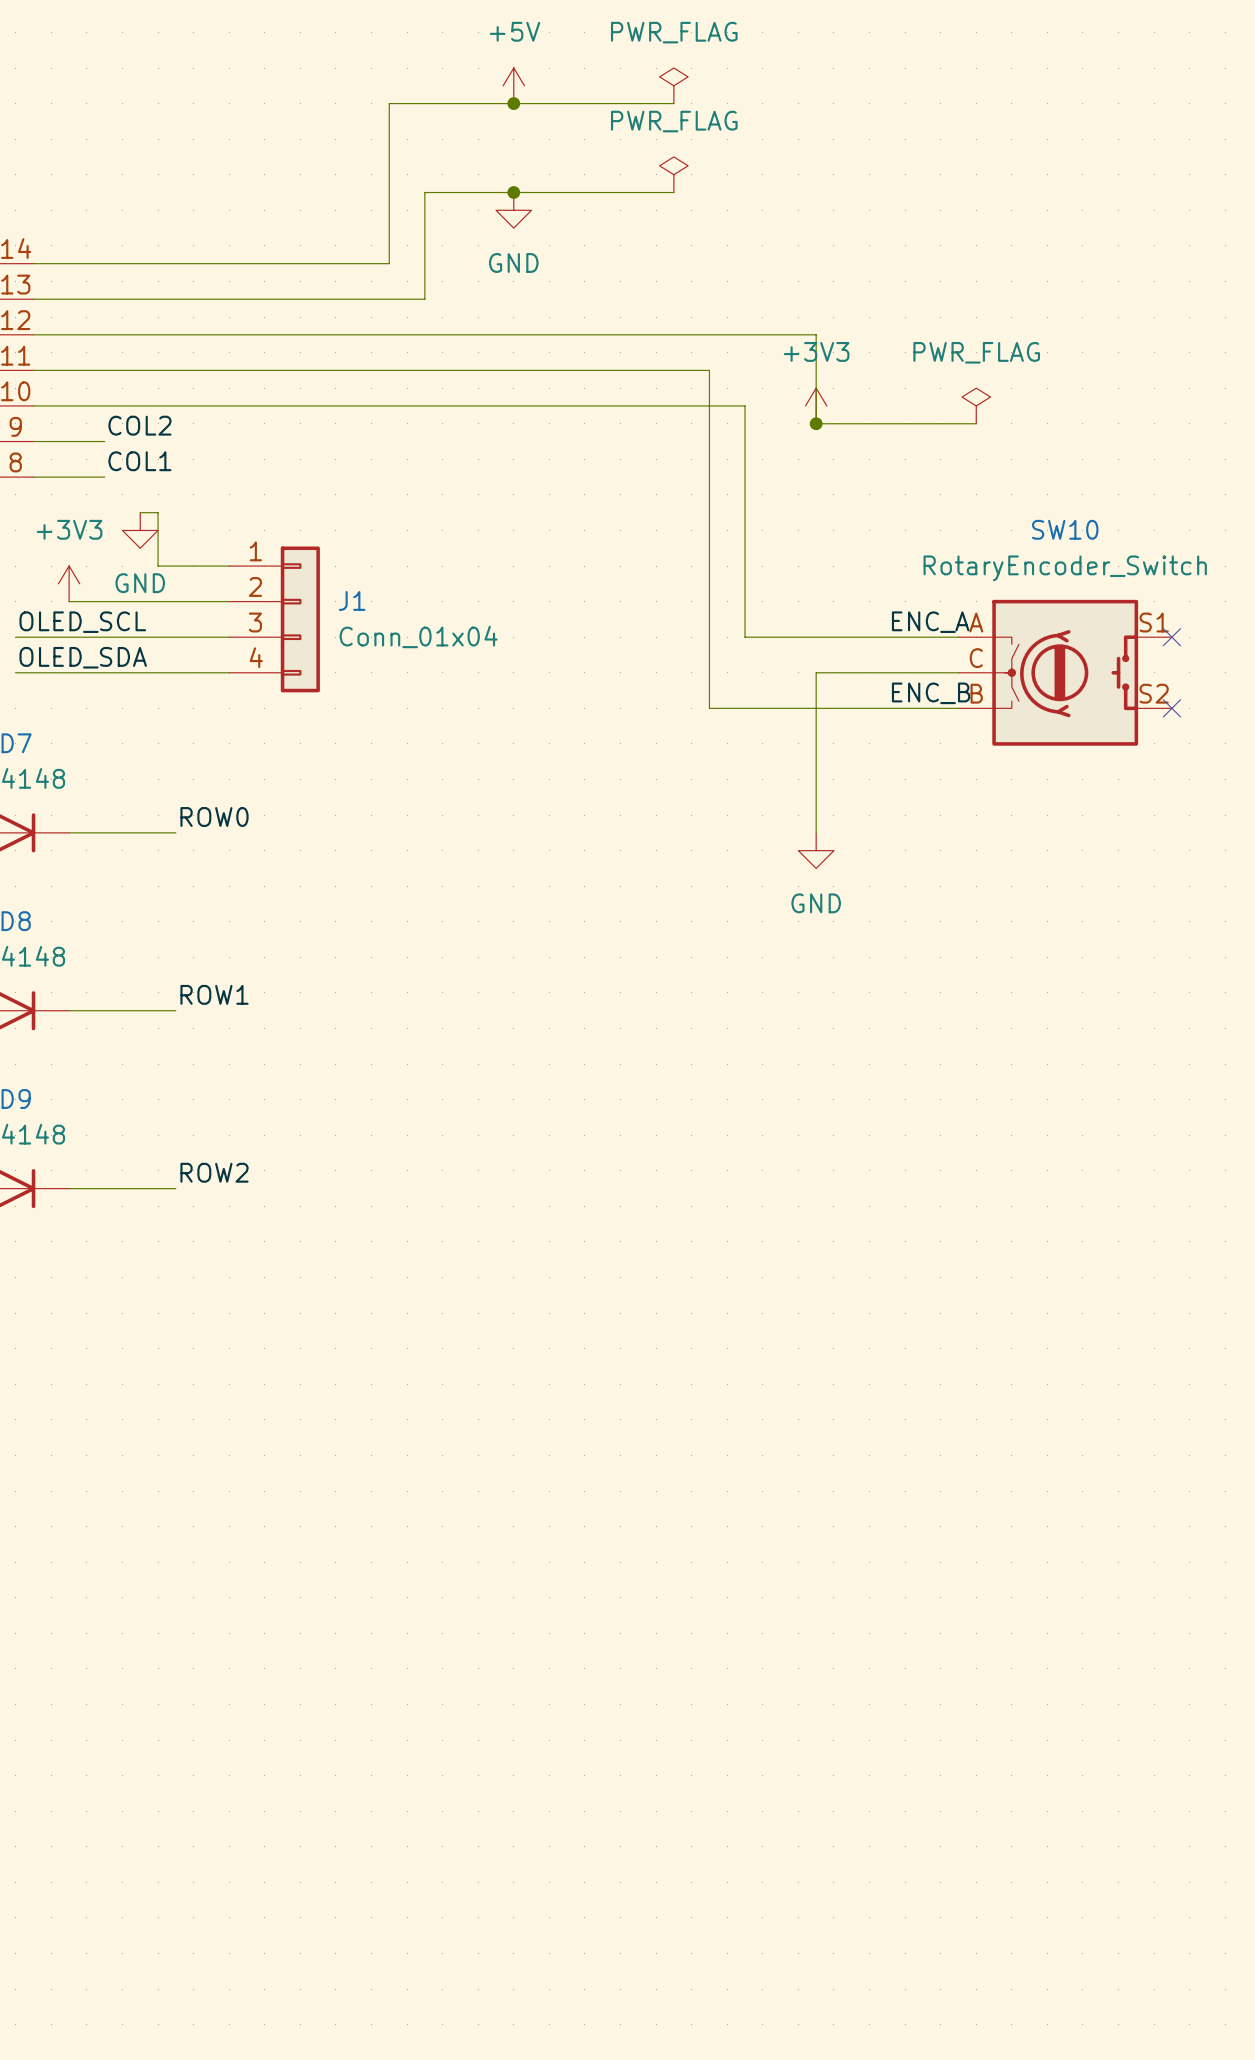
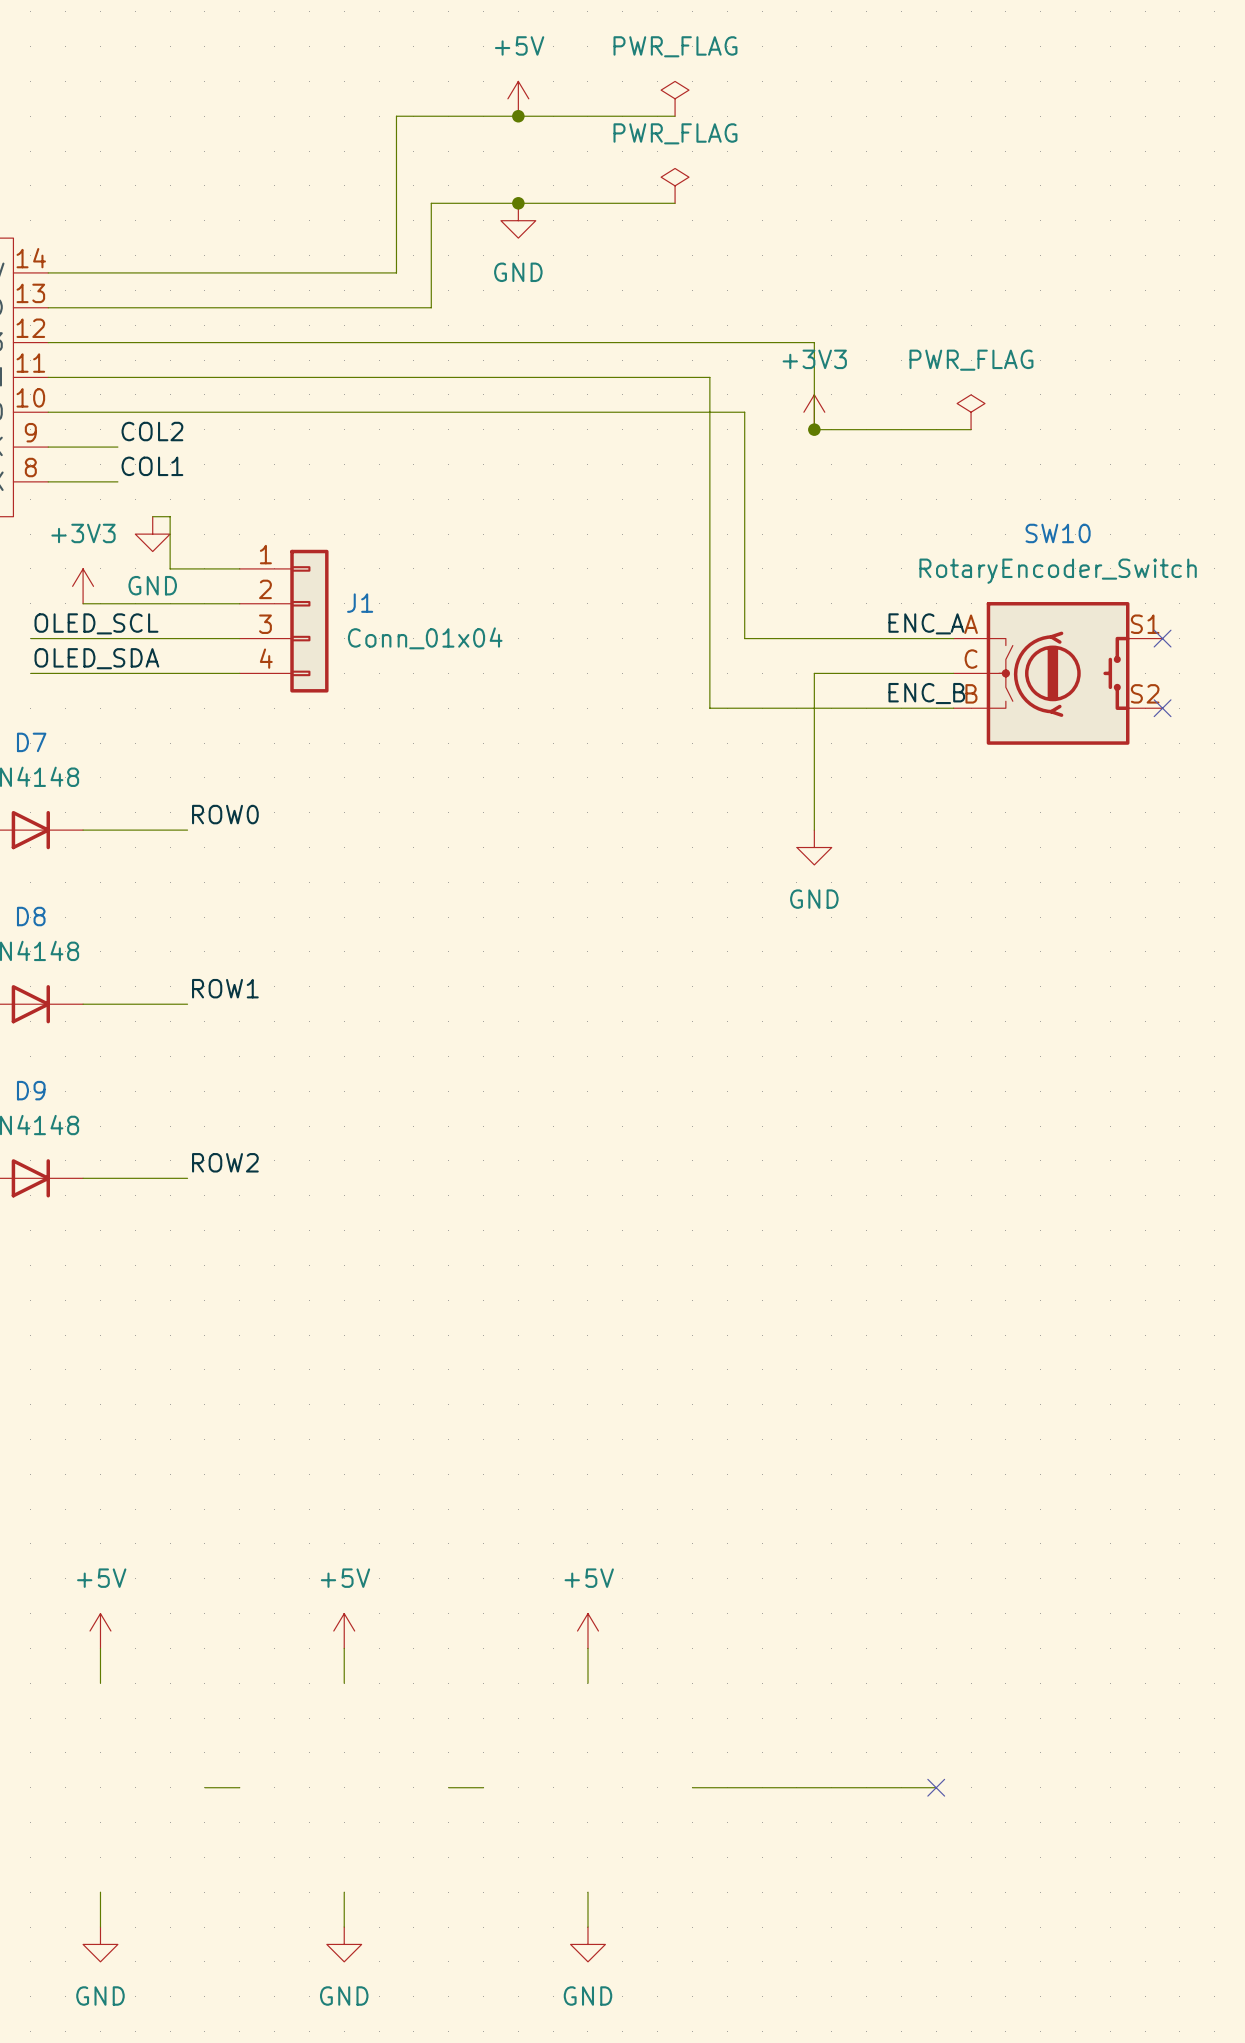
power symbol: none -> +5V (100, 1631)
power symbol: none -> +5V (344, 1631)
power symbol: none -> +5V (587, 1631)
wire: none -> (100, 1648) (100, 1683)
wire: none -> (344, 1648) (344, 1683)
wire: none -> (587, 1648) (587, 1683)
wire: none -> (204, 1787) (239, 1787)
wire: none -> (448, 1787) (483, 1787)
wire: none -> (692, 1787) (936, 1787)
no-connect mark: none -> (936, 1787)
wire: none -> (100, 1892) (100, 1927)
wire: none -> (344, 1892) (344, 1927)
wire: none -> (587, 1892) (587, 1927)
power symbol: none -> GND (100, 1944)
power symbol: none -> GND (344, 1944)
power symbol: none -> GND (587, 1944)

